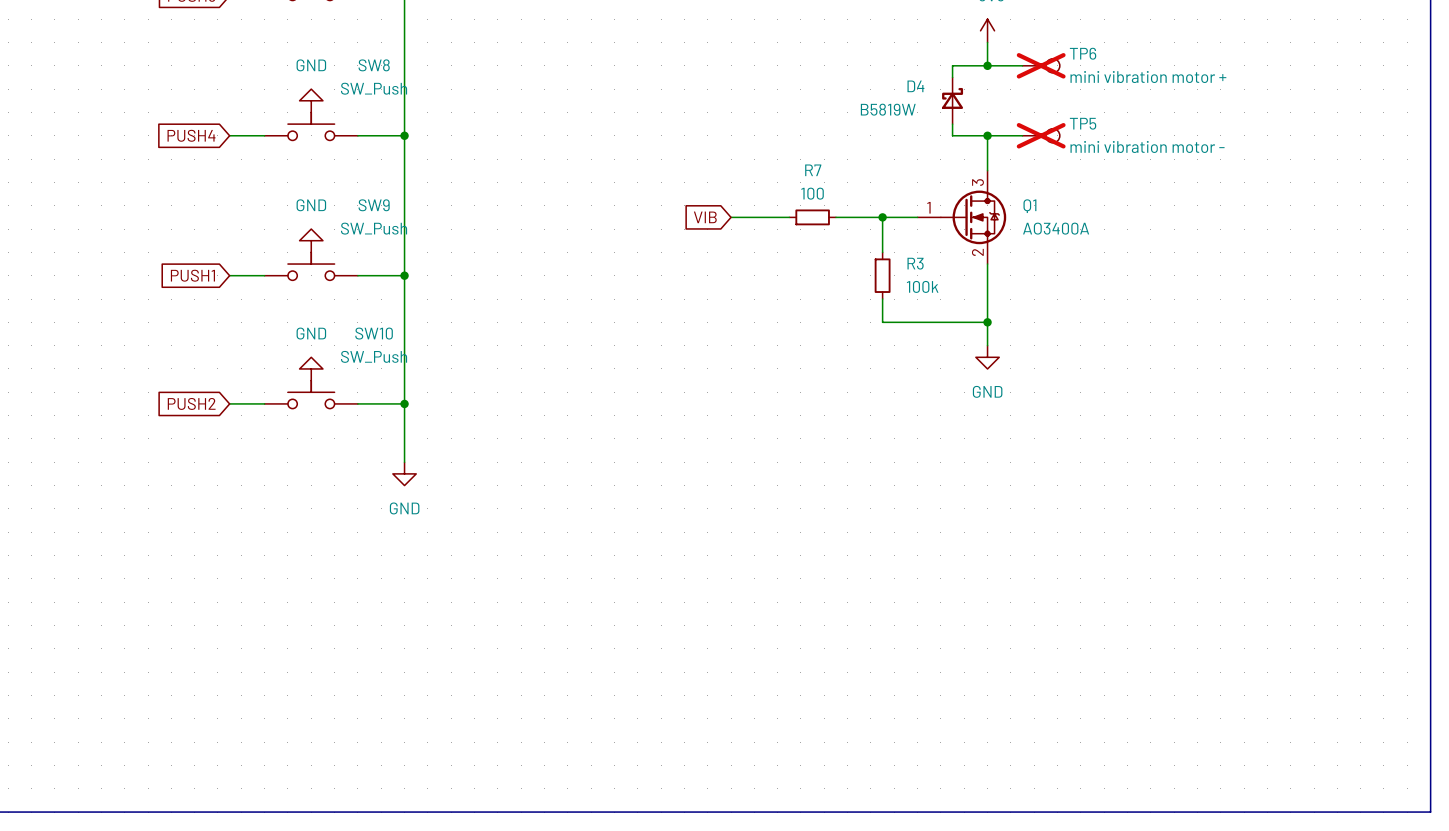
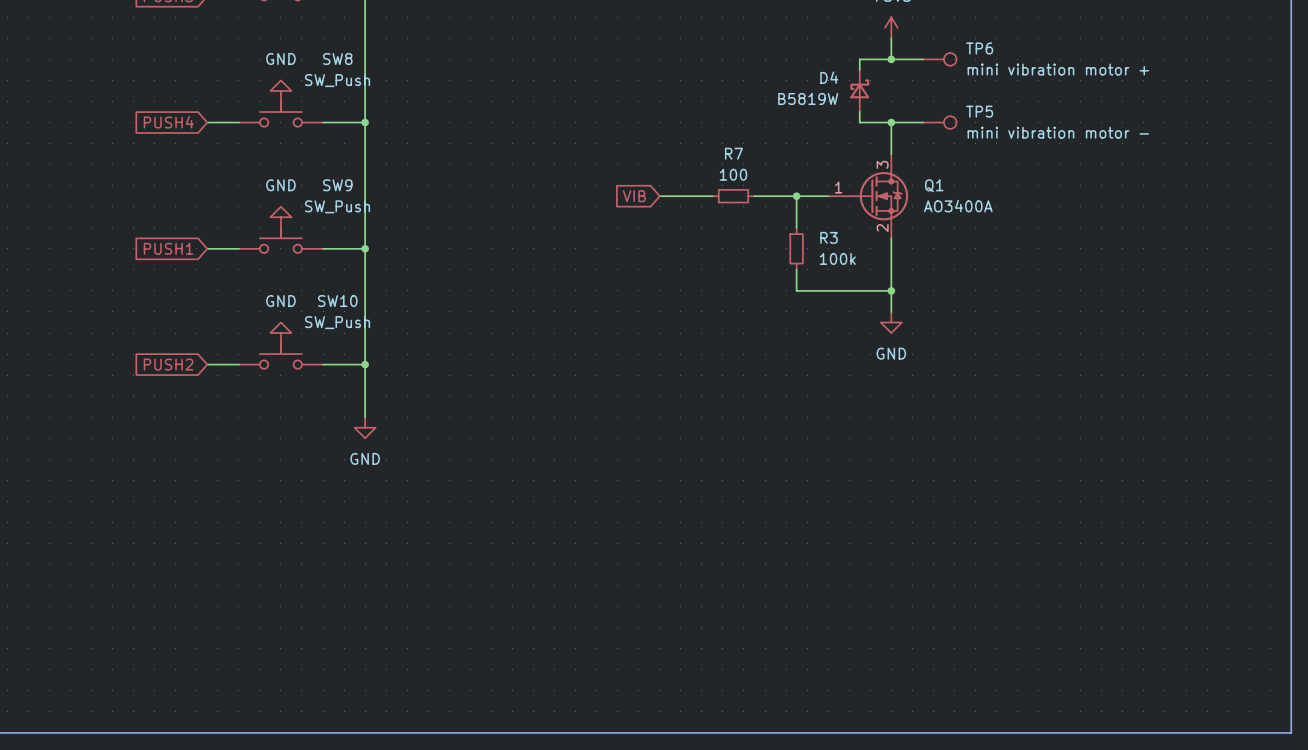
TP6 do-not-place cross: (1041, 65) -> none
TP5 do-not-place cross: (1041, 135) -> none

